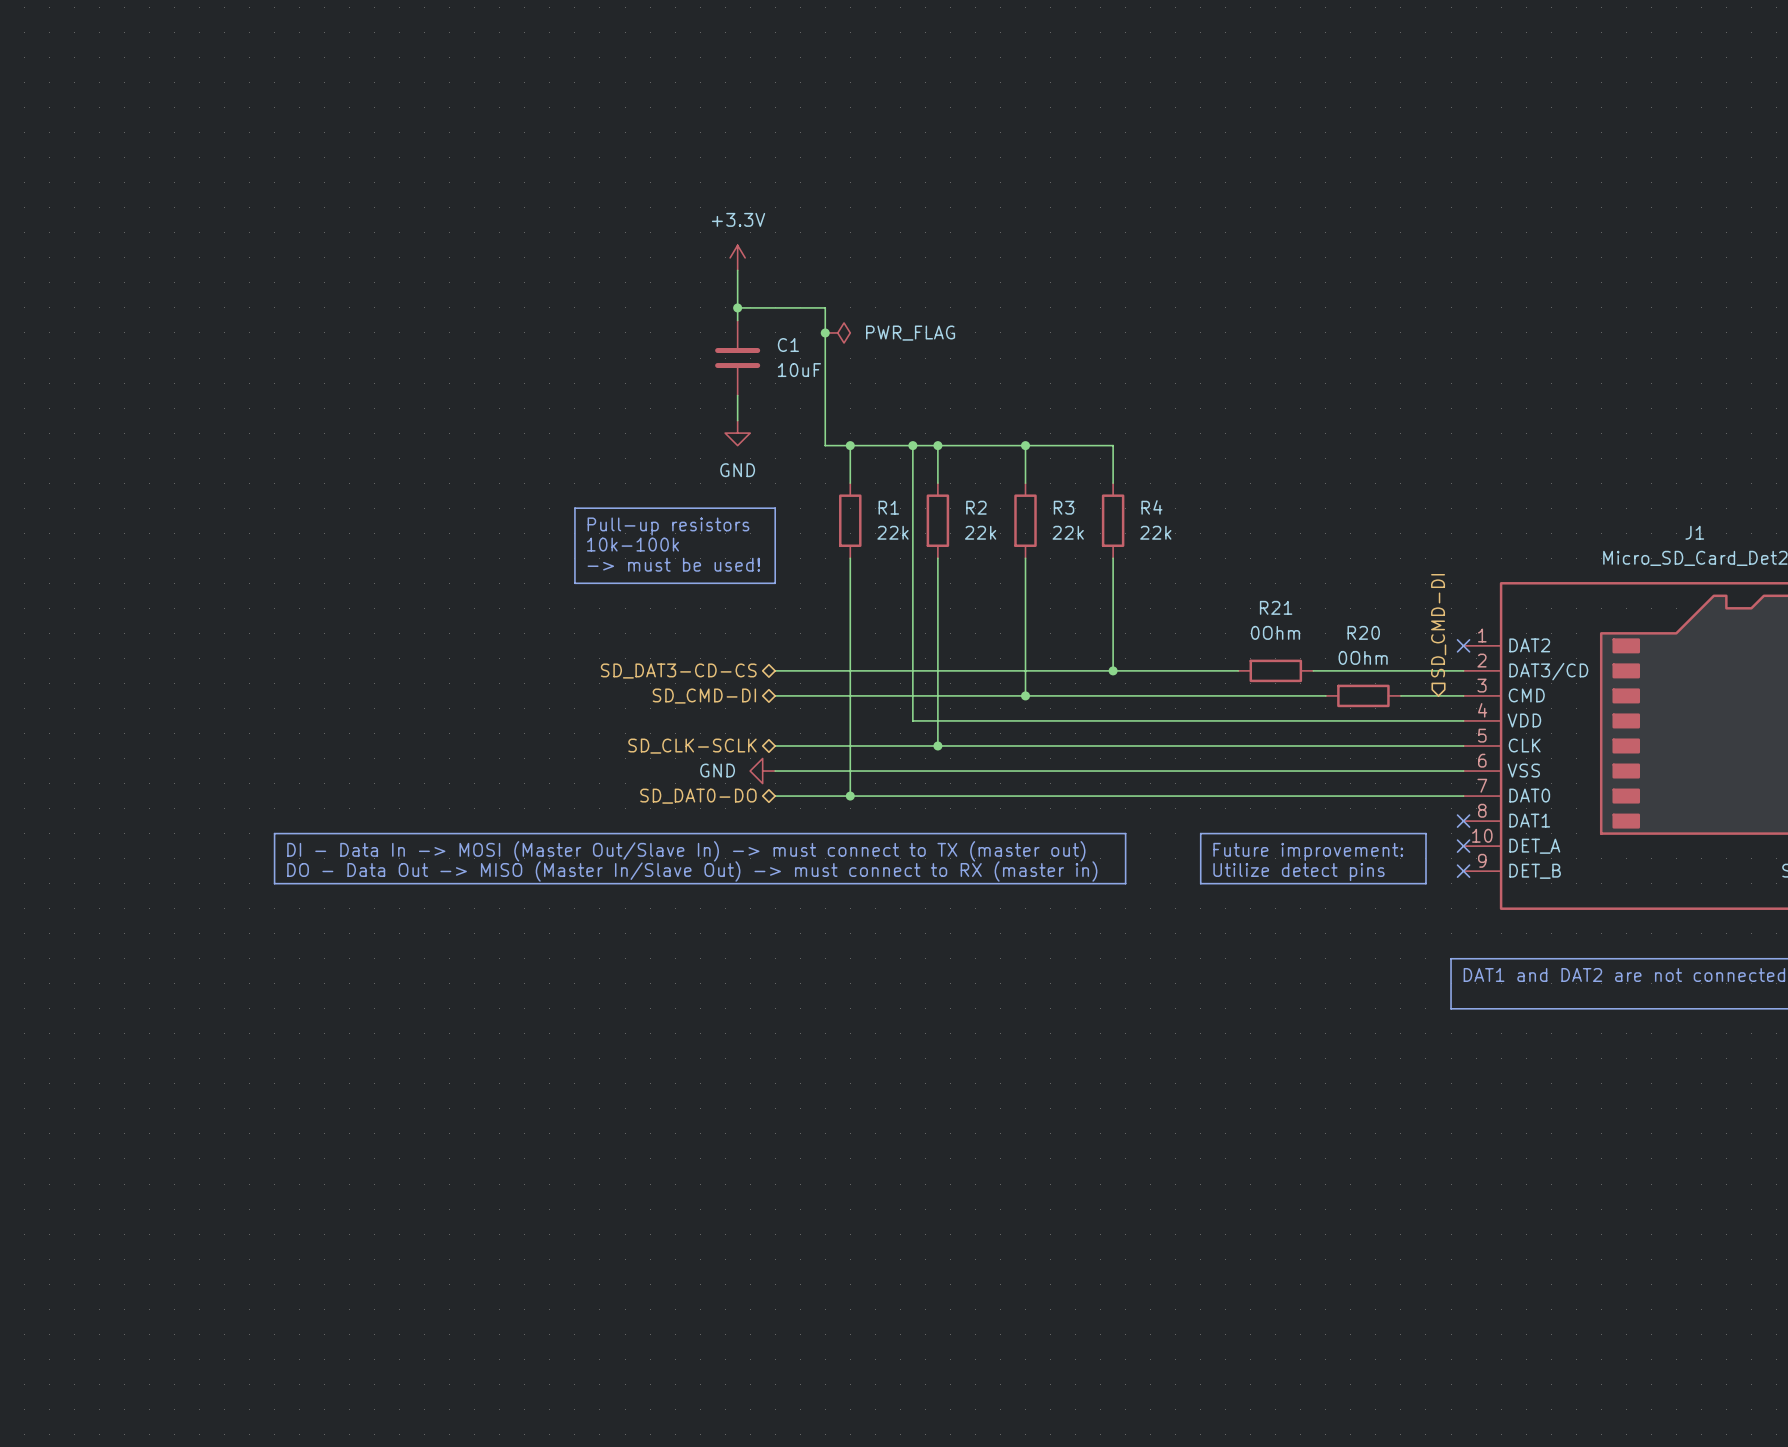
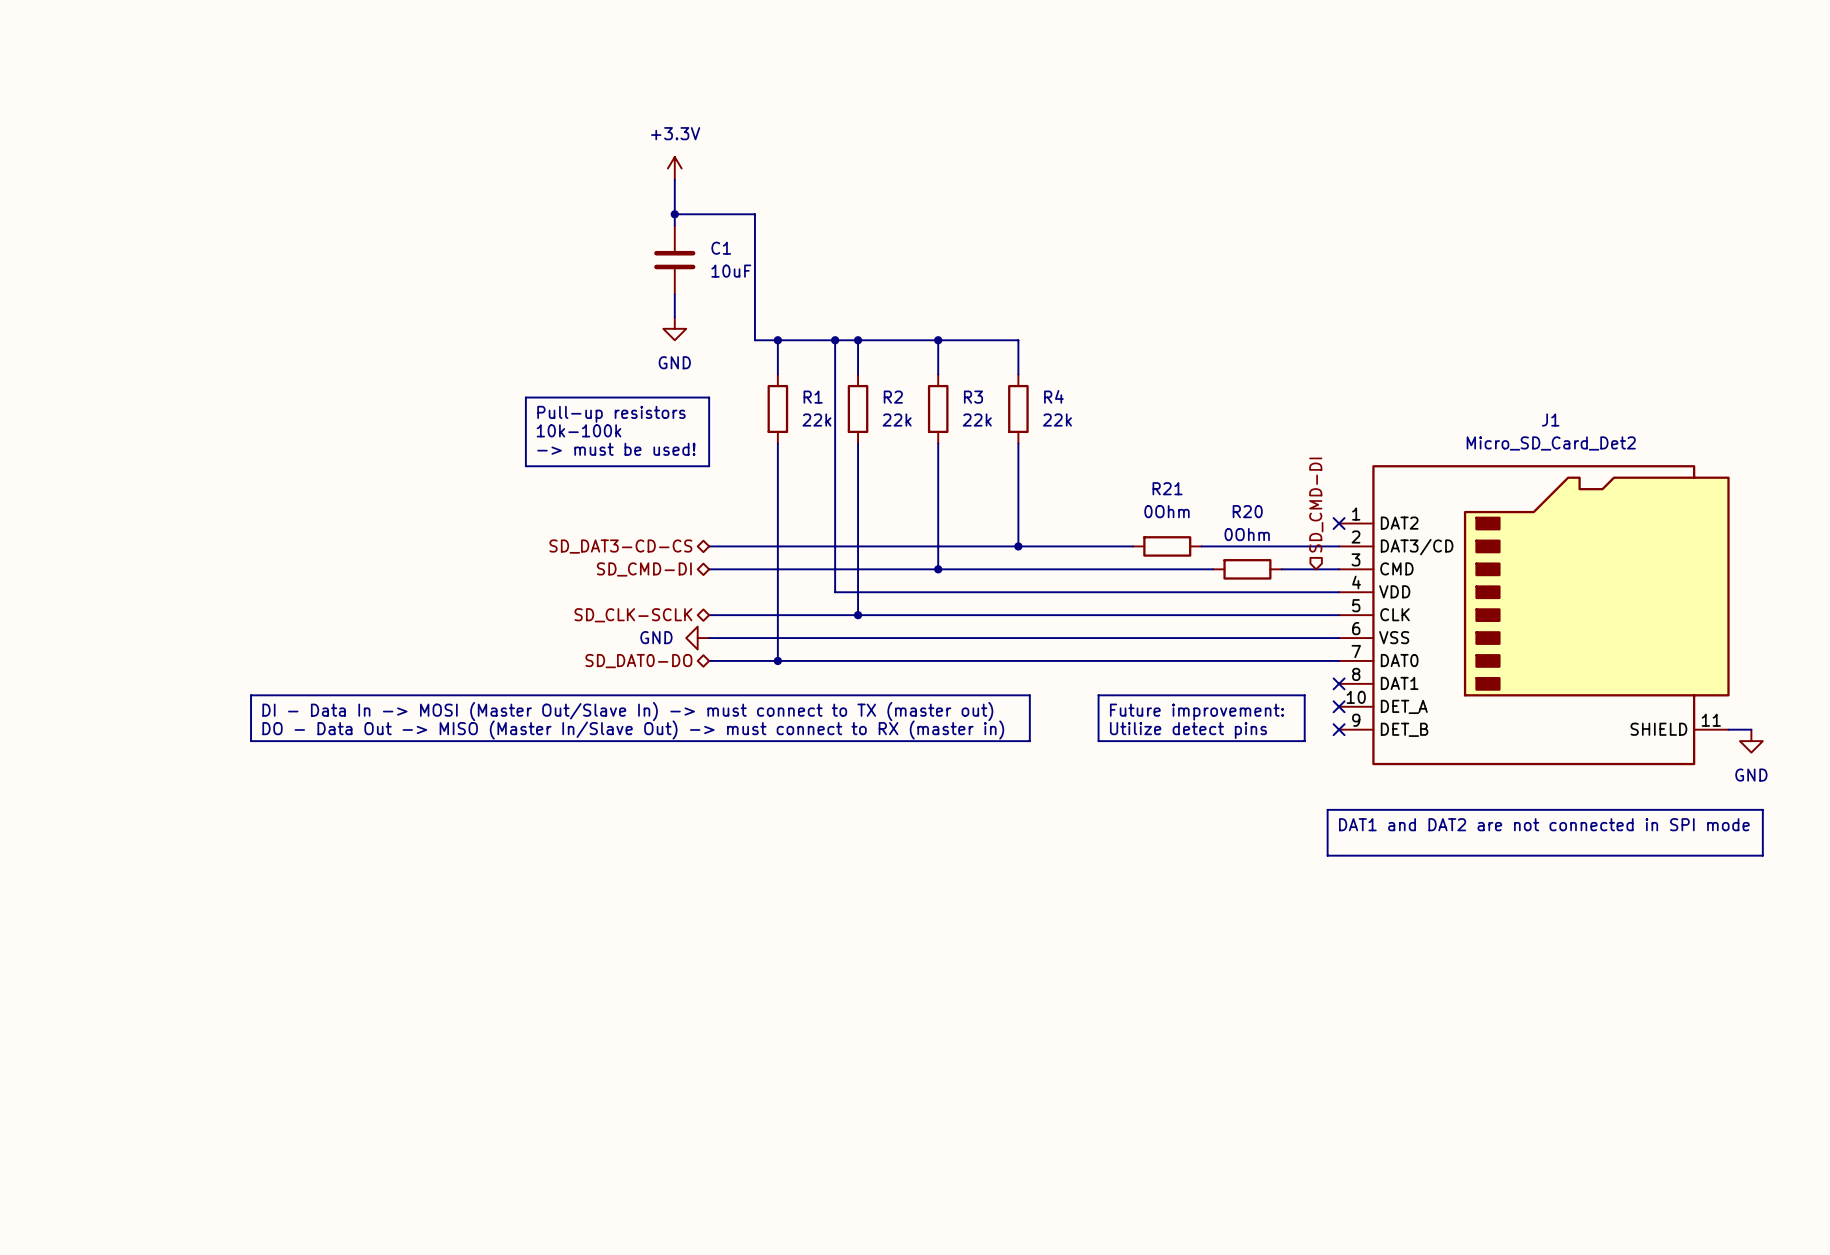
junction: (825, 332) -> none
power symbol: PWR_FLAG (837, 332) -> none

